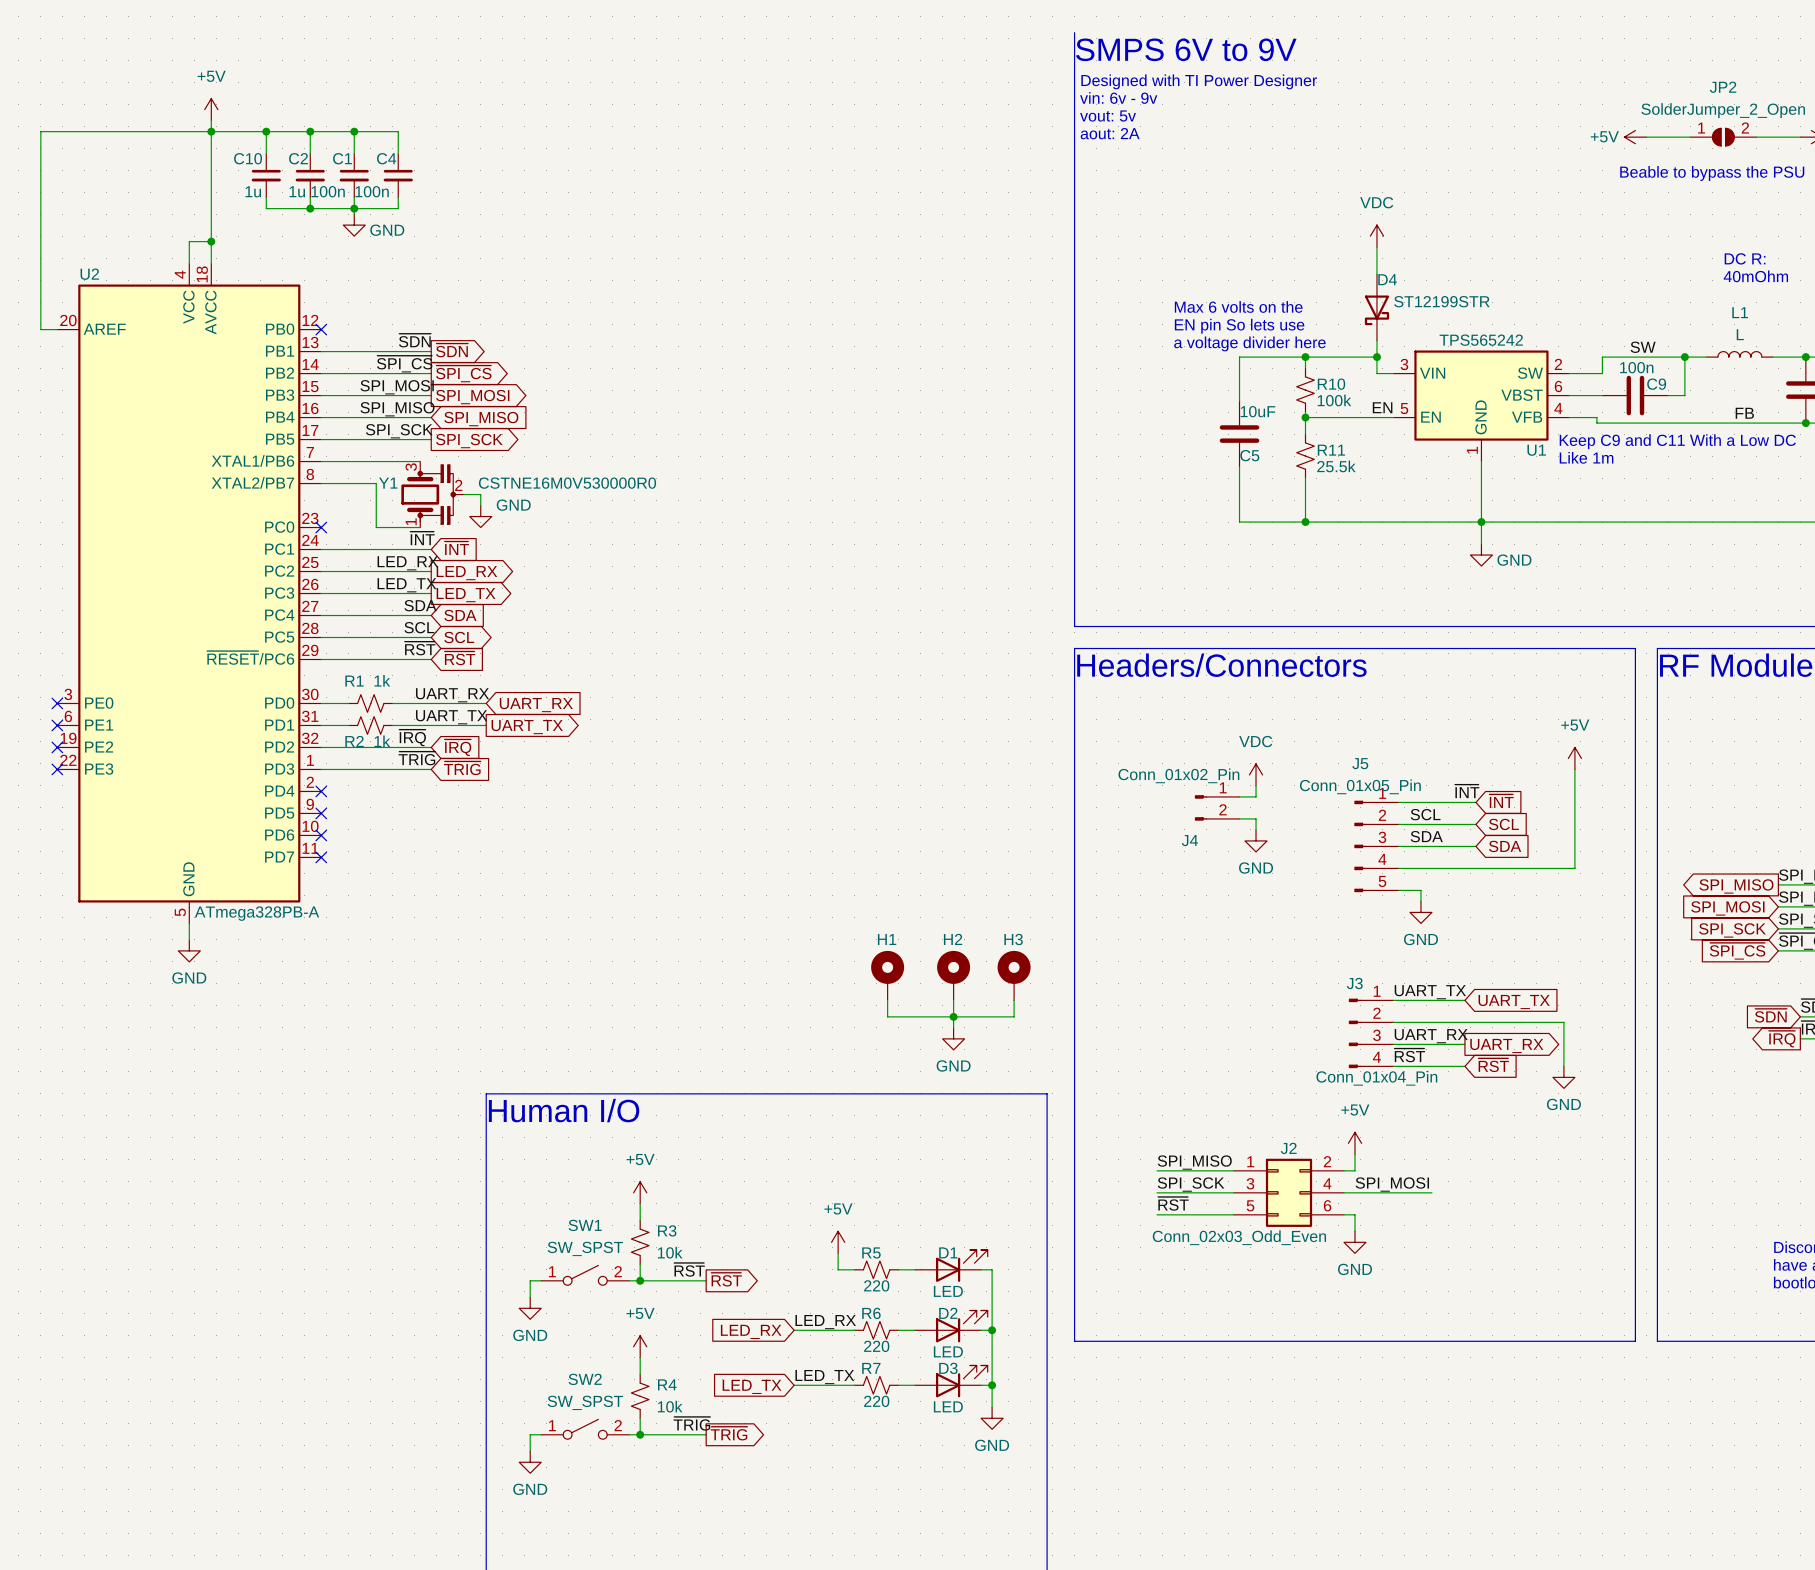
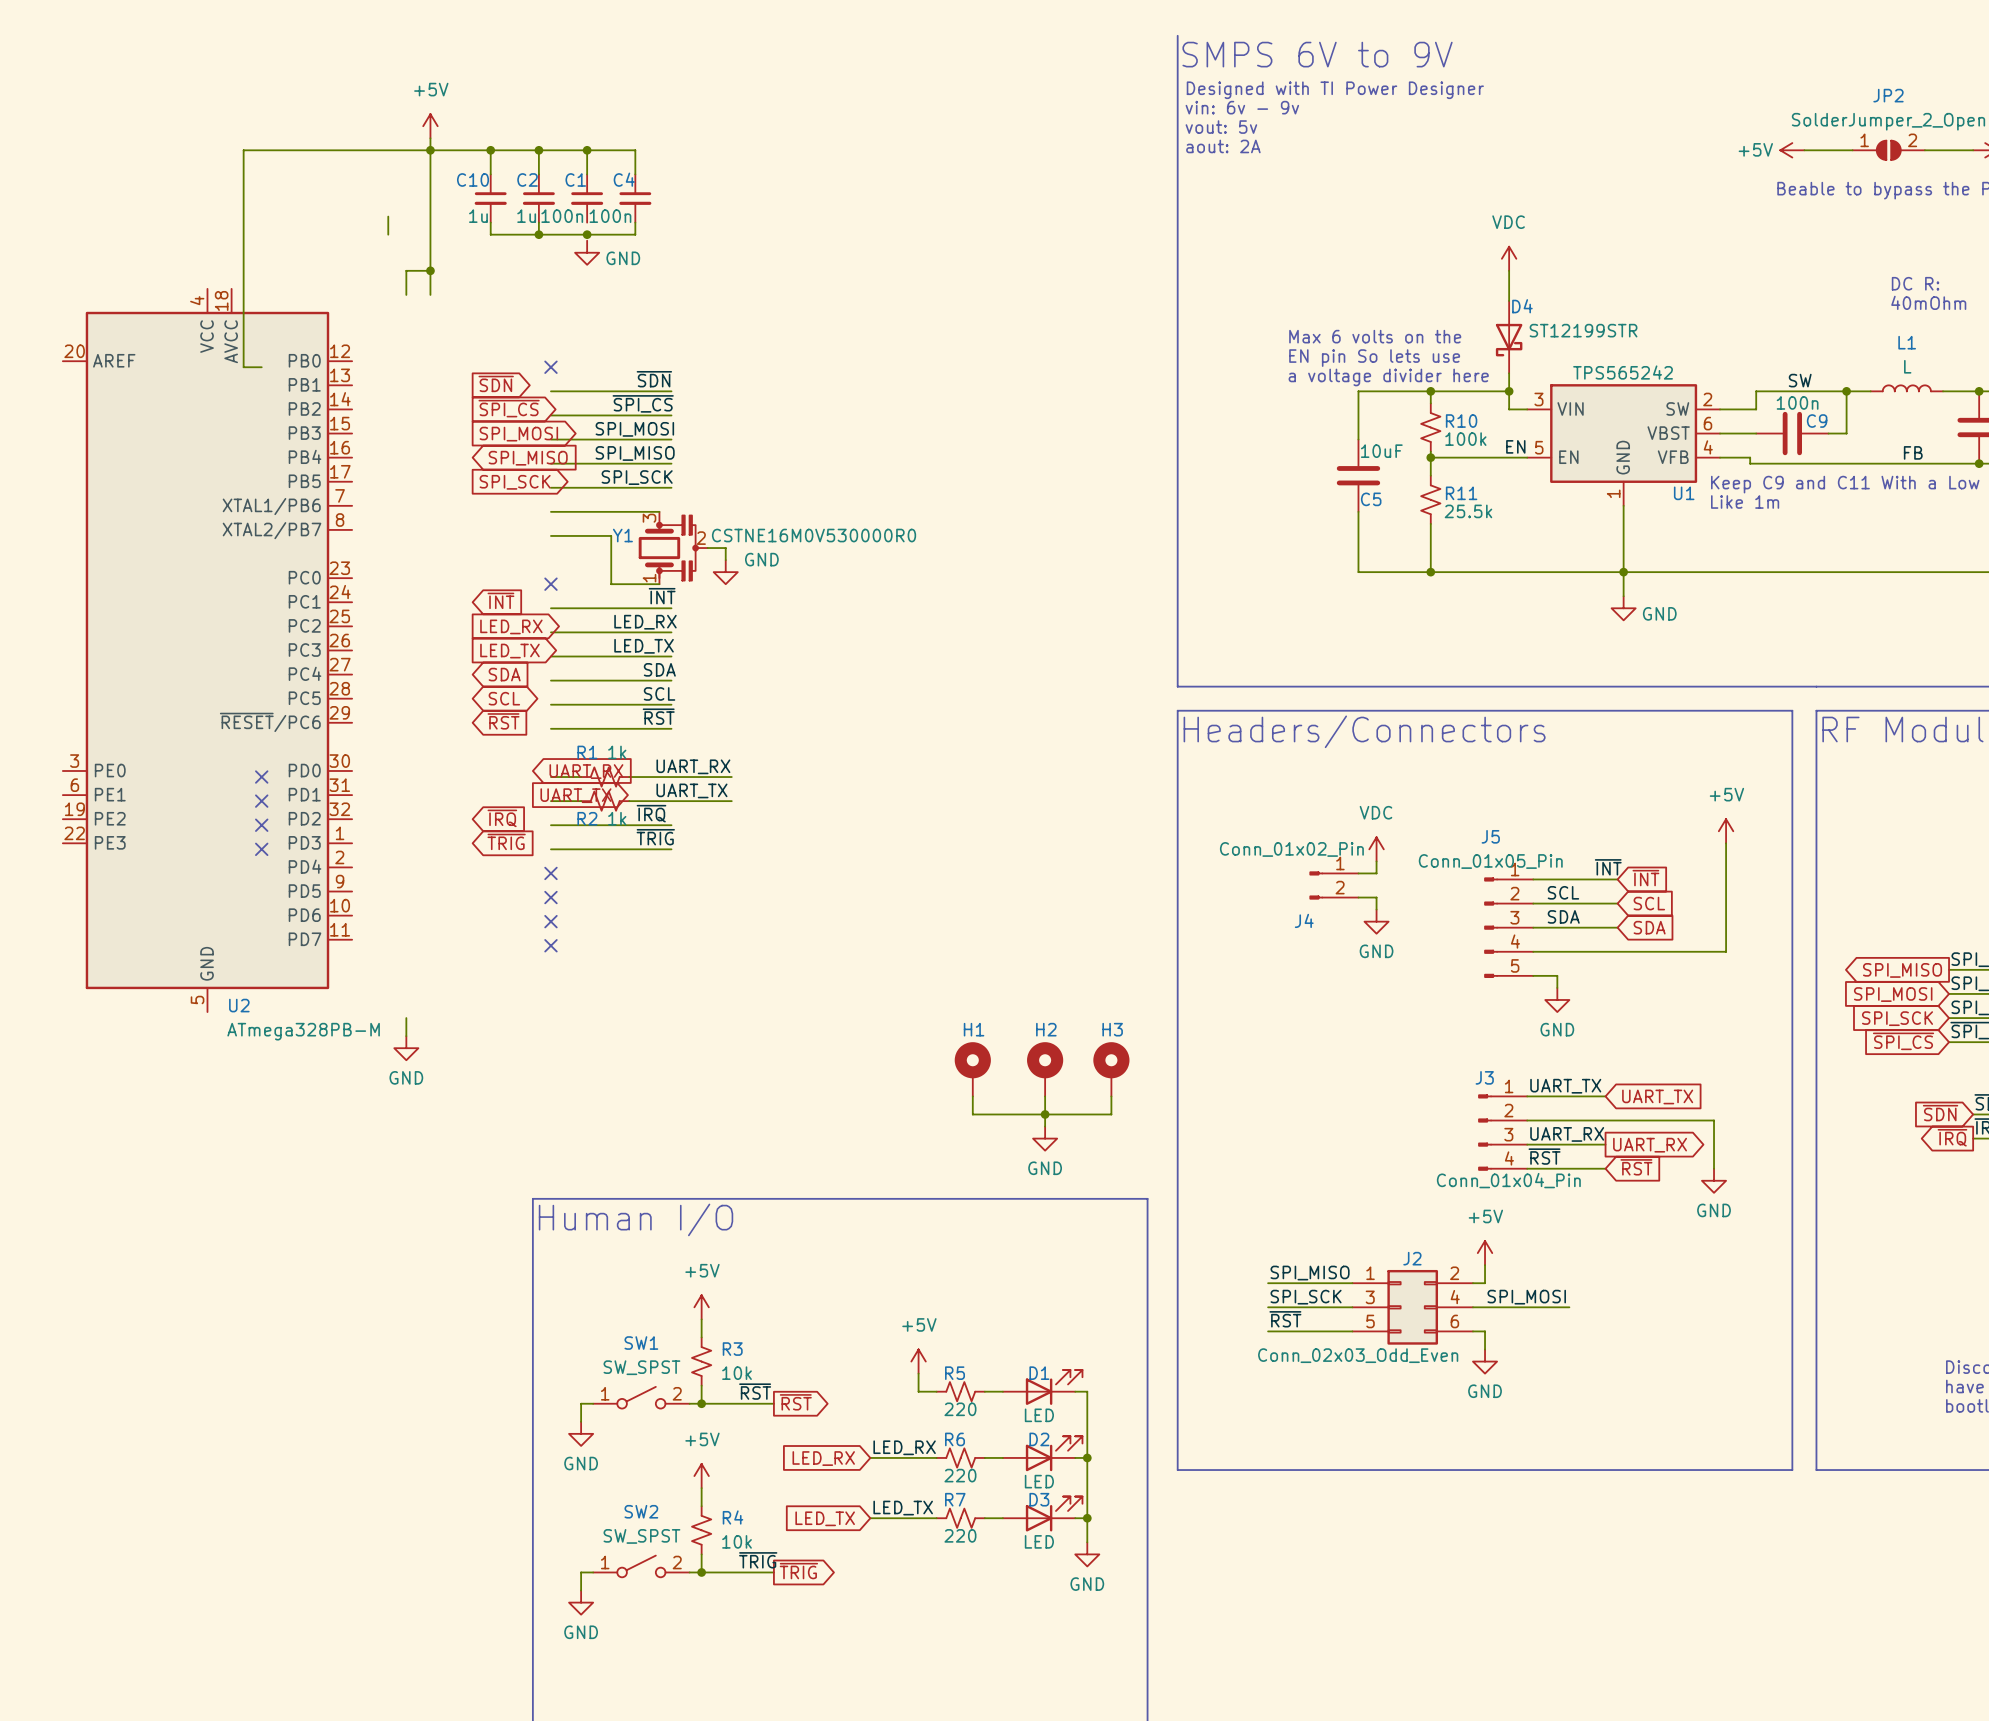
power symbol position: +5V (211, 109) -> +5V (430, 126)
wire: (211, 120) (211, 263) -> (430, 138) (430, 294)
junction: (211, 131) -> none
wire: (266, 131) (266, 153) -> (490, 150) (490, 174)
junction: (266, 131) -> none
wire: (310, 131) (310, 153) -> (538, 150) (538, 174)
junction: (310, 131) -> none
wire: (354, 131) (354, 153) -> (587, 150) (587, 174)
junction position: (354, 131) -> (430, 150)
junction: none -> (490, 150)
junction: none -> (538, 150)
junction: none -> (587, 150)
wire: (398, 153) (398, 131) (40, 131) (40, 329) (57, 329) -> (635, 174) (635, 150) (243, 150) (243, 367) (261, 367)
C10 position: (266, 175) -> (490, 198)
C2 position: (310, 175) -> (538, 198)
C1 position: (354, 175) -> (587, 198)
C4 position: (398, 175) -> (635, 198)
wire: (266, 197) (266, 208) (398, 208) (398, 197) -> (490, 222) (490, 234) (635, 234) (635, 222)
wire: (310, 197) (310, 208) -> (538, 222) (538, 234)
junction: (310, 208) -> none
junction: (354, 208) -> none
junction: none -> (538, 234)
junction: none -> (587, 234)
power symbol: GND (354, 225) -> none
power symbol: none -> GND (587, 252)
wire: (211, 241) (189, 241) (189, 263) -> (430, 270) (406, 270) (406, 294)
junction: (211, 241) -> none
junction: none -> (430, 270)
U2 name position: U2 (89, 274) -> U2 (239, 1005)
no-connect mark: (321, 329) -> none
no-connect mark: none -> (550, 367)
label position: ~{SDN} (414, 340) -> ~{SDN} (654, 379)
wire: (321, 351) (431, 351) -> (550, 391) (671, 391)
label position: ~{SPI_CS} (404, 364) -> ~{SPI_CS} (643, 403)
wire: (321, 373) (431, 373) -> (550, 415) (671, 415)
label position: SPI_MOSI (397, 387) -> SPI_MOSI (634, 429)
wire: (321, 395) (431, 395) -> (550, 439) (671, 439)
label position: SPI_MISO (397, 409) -> SPI_MISO (635, 453)
wire: (321, 417) (431, 417) -> (550, 463) (671, 463)
label position: SPI_SCK (399, 431) -> SPI_SCK (637, 477)
wire: (321, 439) (431, 439) -> (550, 487) (671, 487)
wire: (321, 461) (420, 461) -> (550, 511) (659, 511)
wire: (321, 483) (376, 483) (376, 527) (420, 527) -> (550, 535) (611, 535) (611, 584) (659, 584)
Y1 position: (432, 494) -> (673, 548)
wire: (464, 494) (480, 494) (480, 505) -> (707, 548) (725, 548) (725, 560)
power symbol: GND (480, 516) -> none
power symbol: none -> GND (725, 572)
no-connect mark: (321, 527) -> none
no-connect mark: none -> (550, 584)
label position: ~{INT} (422, 538) -> ~{INT} (662, 596)
wire: (321, 549) (431, 549) -> (550, 608) (671, 608)
label position: LED_RX (407, 563) -> LED_RX (645, 622)
wire: (321, 571) (431, 571) -> (550, 632) (671, 632)
label position: LED_TX (406, 585) -> LED_TX (644, 646)
wire: (321, 593) (431, 593) -> (550, 656) (671, 656)
label position: SDA (420, 605) -> SDA (659, 669)
wire: (321, 615) (431, 615) -> (550, 680) (671, 680)
label position: SCL (419, 627) -> SCL (659, 693)
wire: (321, 637) (431, 637) -> (550, 704) (671, 704)
label position: ~{RST} (420, 648) -> ~{RST} (658, 716)
wire: (321, 659) (431, 659) -> (550, 728) (671, 728)
label position: UART_RX (452, 695) -> UART_RX (693, 766)
no-connect mark: (57, 703) -> none
wire: (321, 703) (348, 703) -> (550, 777) (581, 777)
R1 position: (370, 703) -> (605, 777)
wire: (392, 703) (486, 703) -> (629, 777) (731, 777)
no-connect mark: none -> (261, 777)
label position: UART_TX (451, 717) -> UART_TX (691, 790)
no-connect mark: (57, 725) -> none
wire: (321, 725) (348, 725) -> (550, 801) (581, 801)
R2 position: (370, 725) -> (605, 801)
wire: (392, 725) (486, 725) -> (629, 801) (731, 801)
no-connect mark: none -> (261, 801)
label position: ~{IRQ} (412, 737) -> ~{IRQ} (651, 813)
no-connect mark: (57, 747) -> none
wire: (321, 747) (431, 747) -> (550, 825) (671, 825)
no-connect mark: none -> (261, 825)
label position: ~{TRIG} (416, 758) -> ~{TRIG} (655, 837)
no-connect mark: (57, 769) -> none
wire: (321, 769) (431, 769) -> (550, 849) (671, 849)
no-connect mark: none -> (261, 849)
no-connect mark: (321, 791) -> none
no-connect mark: none -> (550, 873)
no-connect mark: (321, 813) -> none
no-connect mark: none -> (550, 897)
no-connect mark: (321, 835) -> none
no-connect mark: none -> (550, 921)
no-connect mark: (321, 857) -> none
no-connect mark: none -> (550, 945)
U2 value: ATmega328PB-A (257, 913) -> ATmega328PB-M (303, 1031)
wire: (189, 923) (189, 939) -> (406, 1018) (406, 1036)
power symbol position: GND (189, 950) -> GND (406, 1048)

